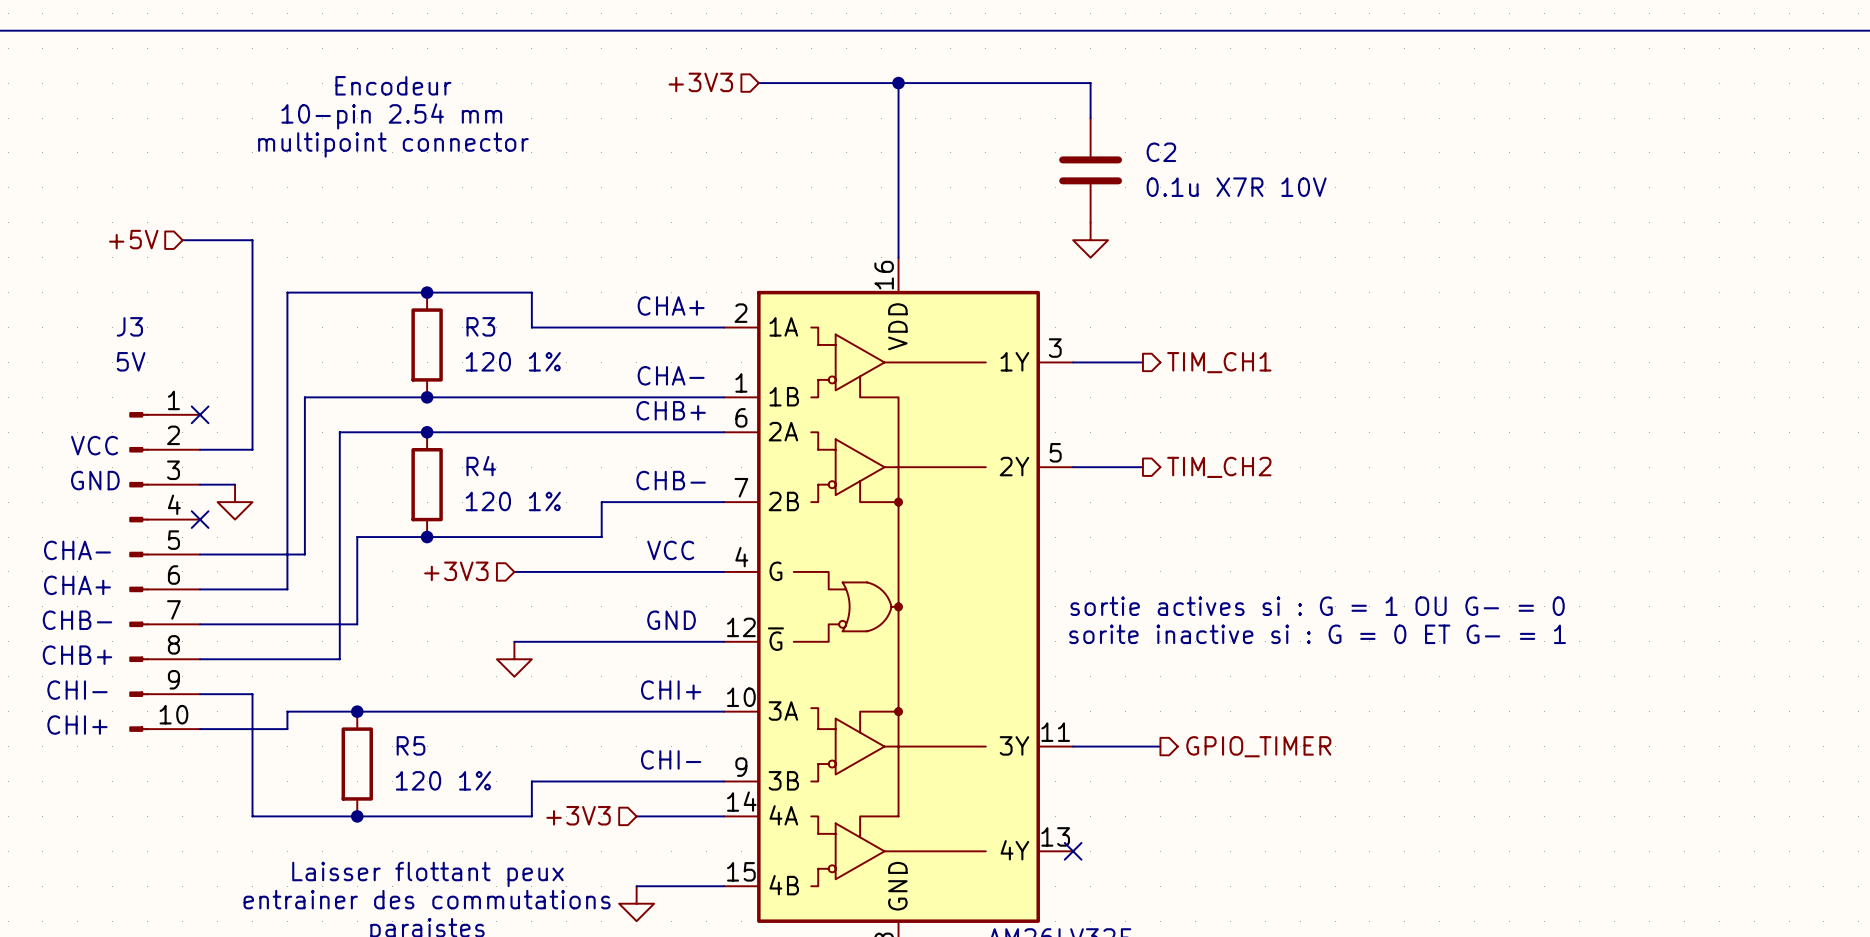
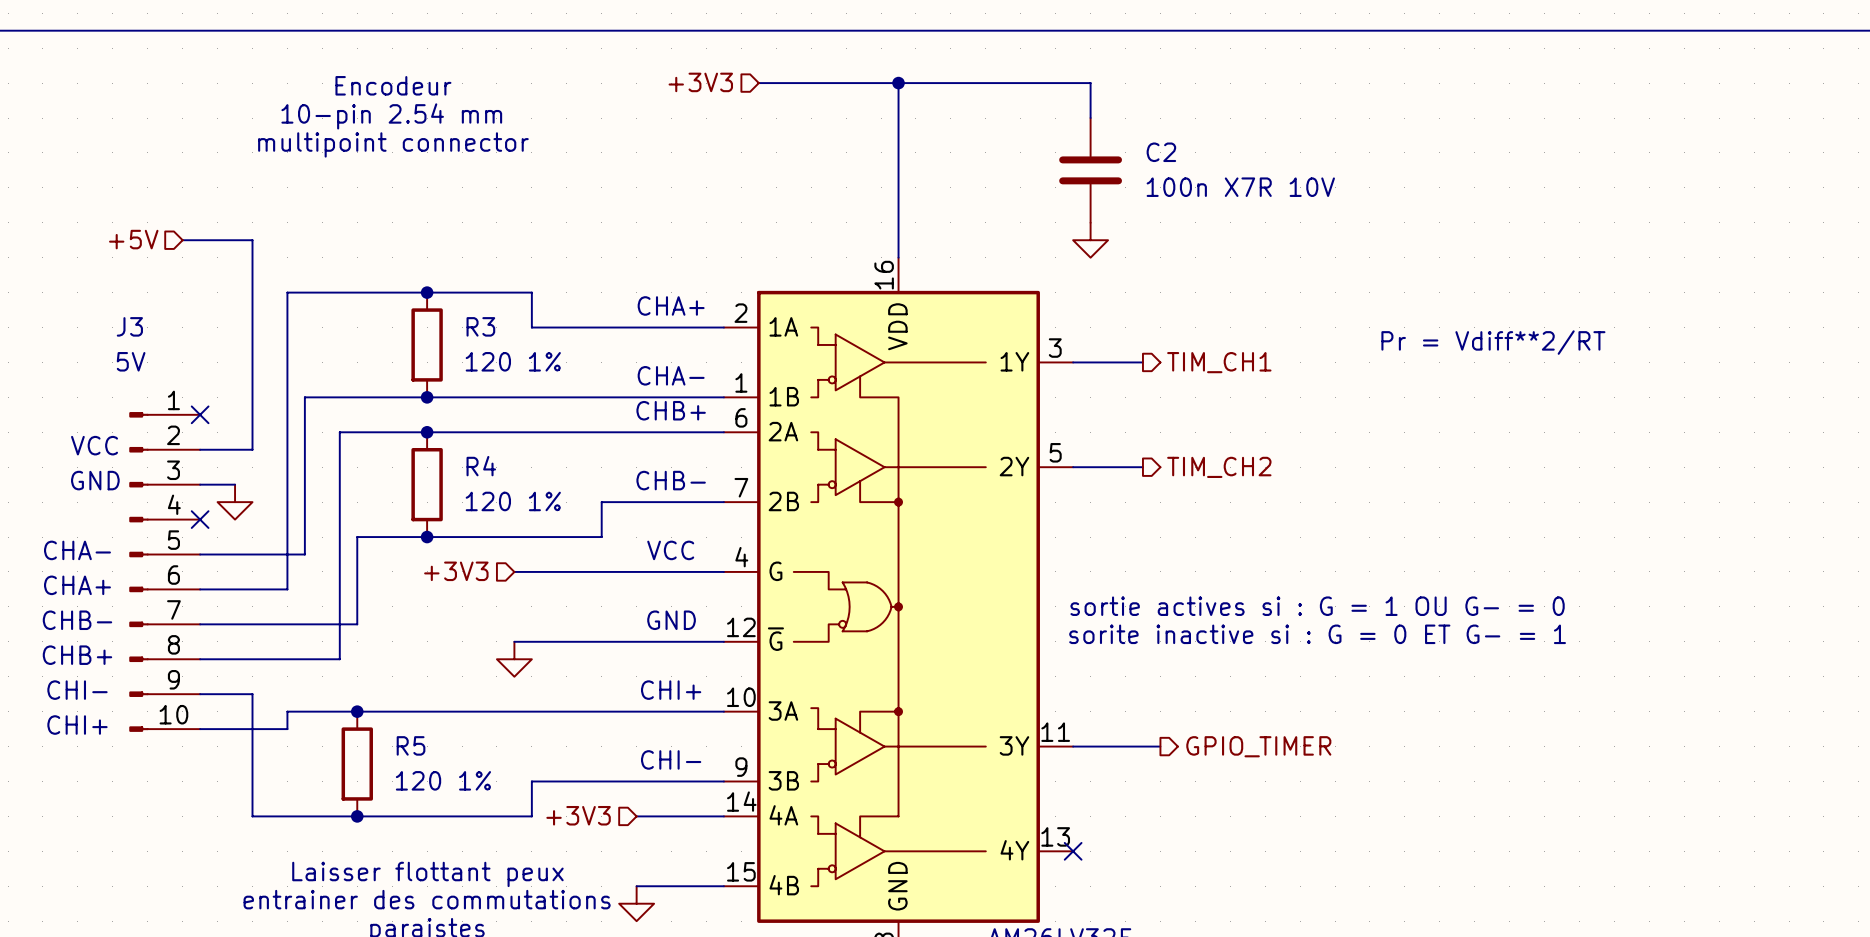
C2 value: 0.1u X7R 10V (1236, 187) -> 100n X7R 10V (1240, 187)
text: none -> Pr = Vdiff**2/RT (1493, 342)

